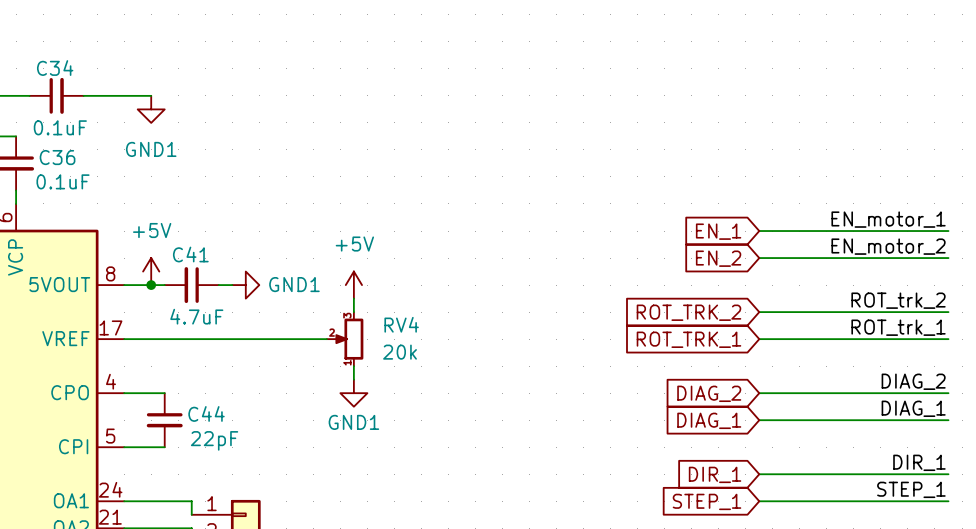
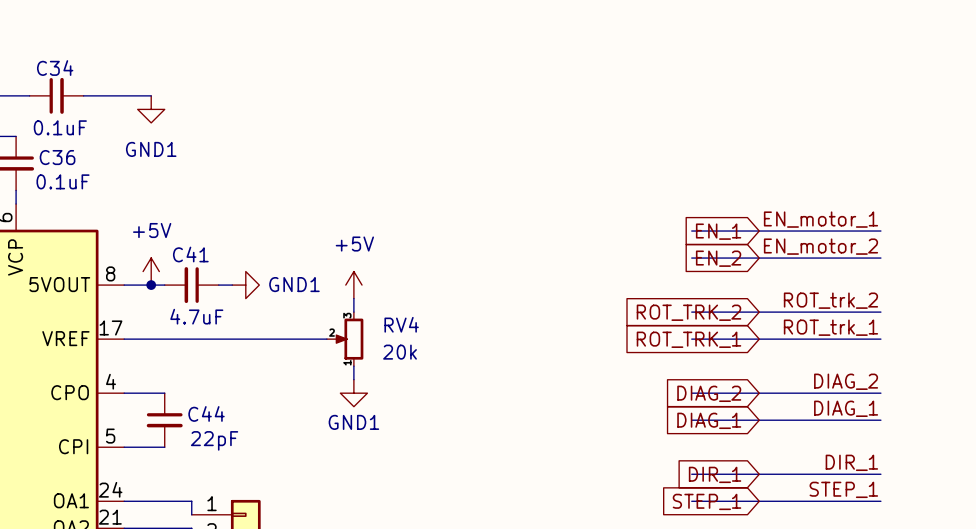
label position: EN_motor_1 (888, 219) -> EN_motor_1 (820, 219)
wire: (880, 231) (948, 231) -> (691, 231) (759, 231)
label position: EN_motor_2 (888, 246) -> EN_motor_2 (820, 246)
wire: (880, 258) (948, 258) -> (691, 258) (759, 258)
label position: ROT_trk_2 (898, 300) -> ROT_trk_2 (830, 300)
wire: (880, 312) (948, 312) -> (691, 312) (759, 312)
label position: ROT_trk_1 (898, 327) -> ROT_trk_1 (830, 327)
wire: (880, 339) (948, 339) -> (691, 339) (759, 339)
label position: DIAG_2 (913, 381) -> DIAG_2 (846, 381)
wire: (880, 393) (948, 393) -> (691, 393) (759, 393)
label position: DIAG_1 (913, 408) -> DIAG_1 (846, 408)
wire: (880, 420) (948, 420) -> (691, 420) (759, 420)
label position: DIR_1 (919, 462) -> DIR_1 (851, 462)
wire: (880, 474) (948, 474) -> (691, 474) (759, 474)
label position: STEP_1 (911, 489) -> STEP_1 (843, 489)
wire: (880, 501) (948, 501) -> (691, 501) (759, 501)

